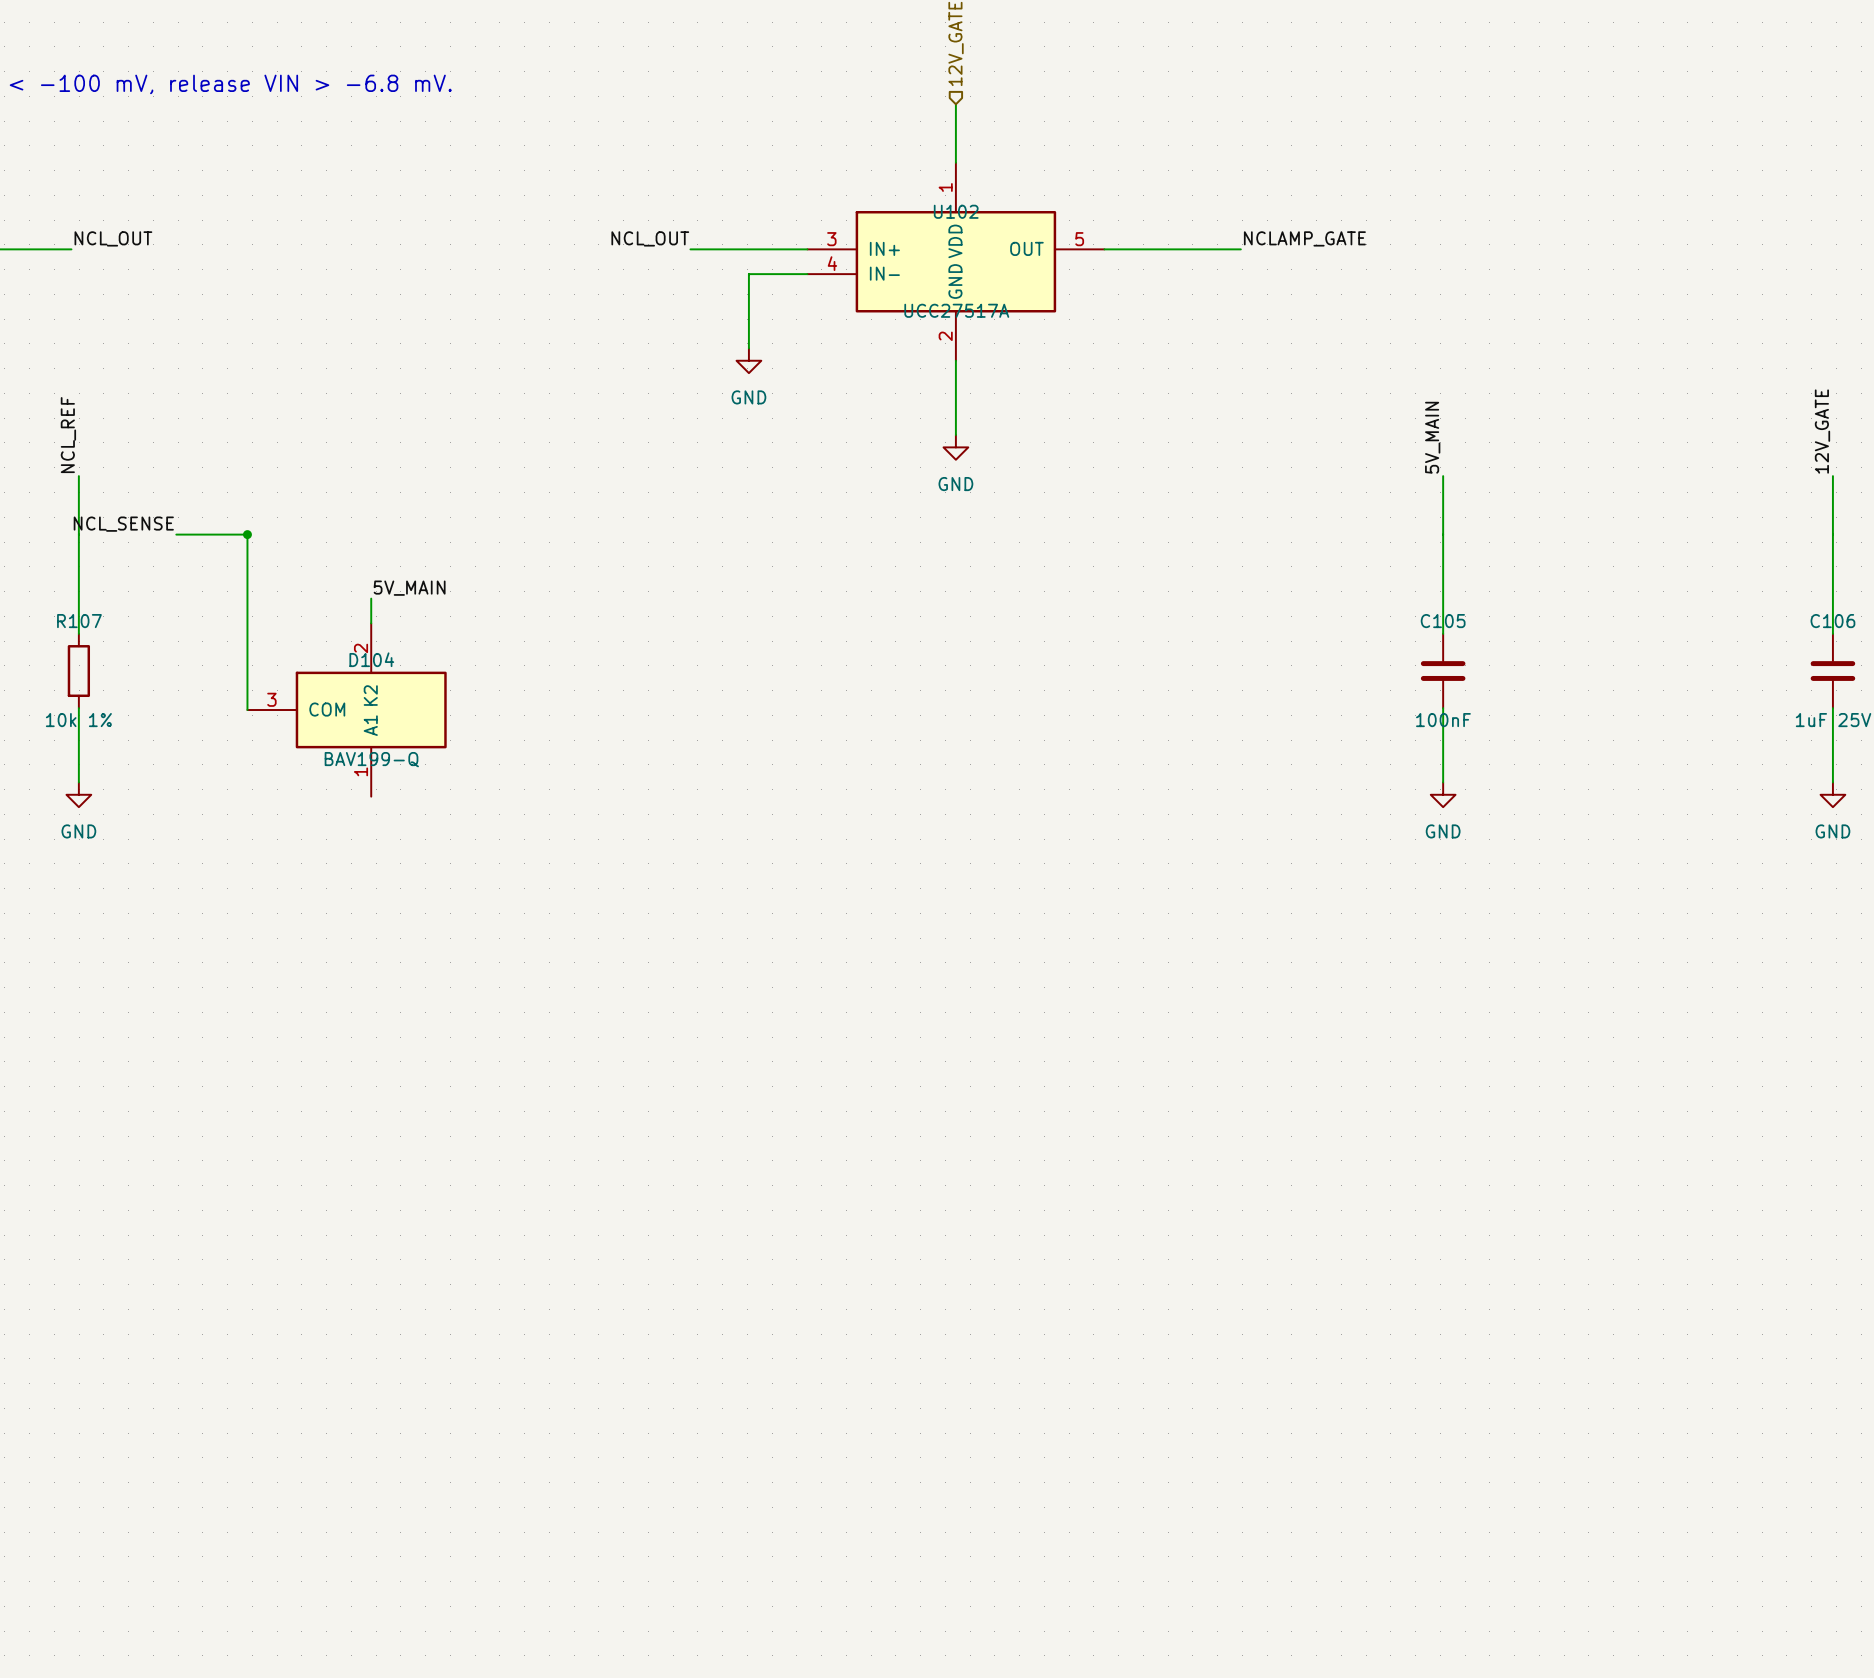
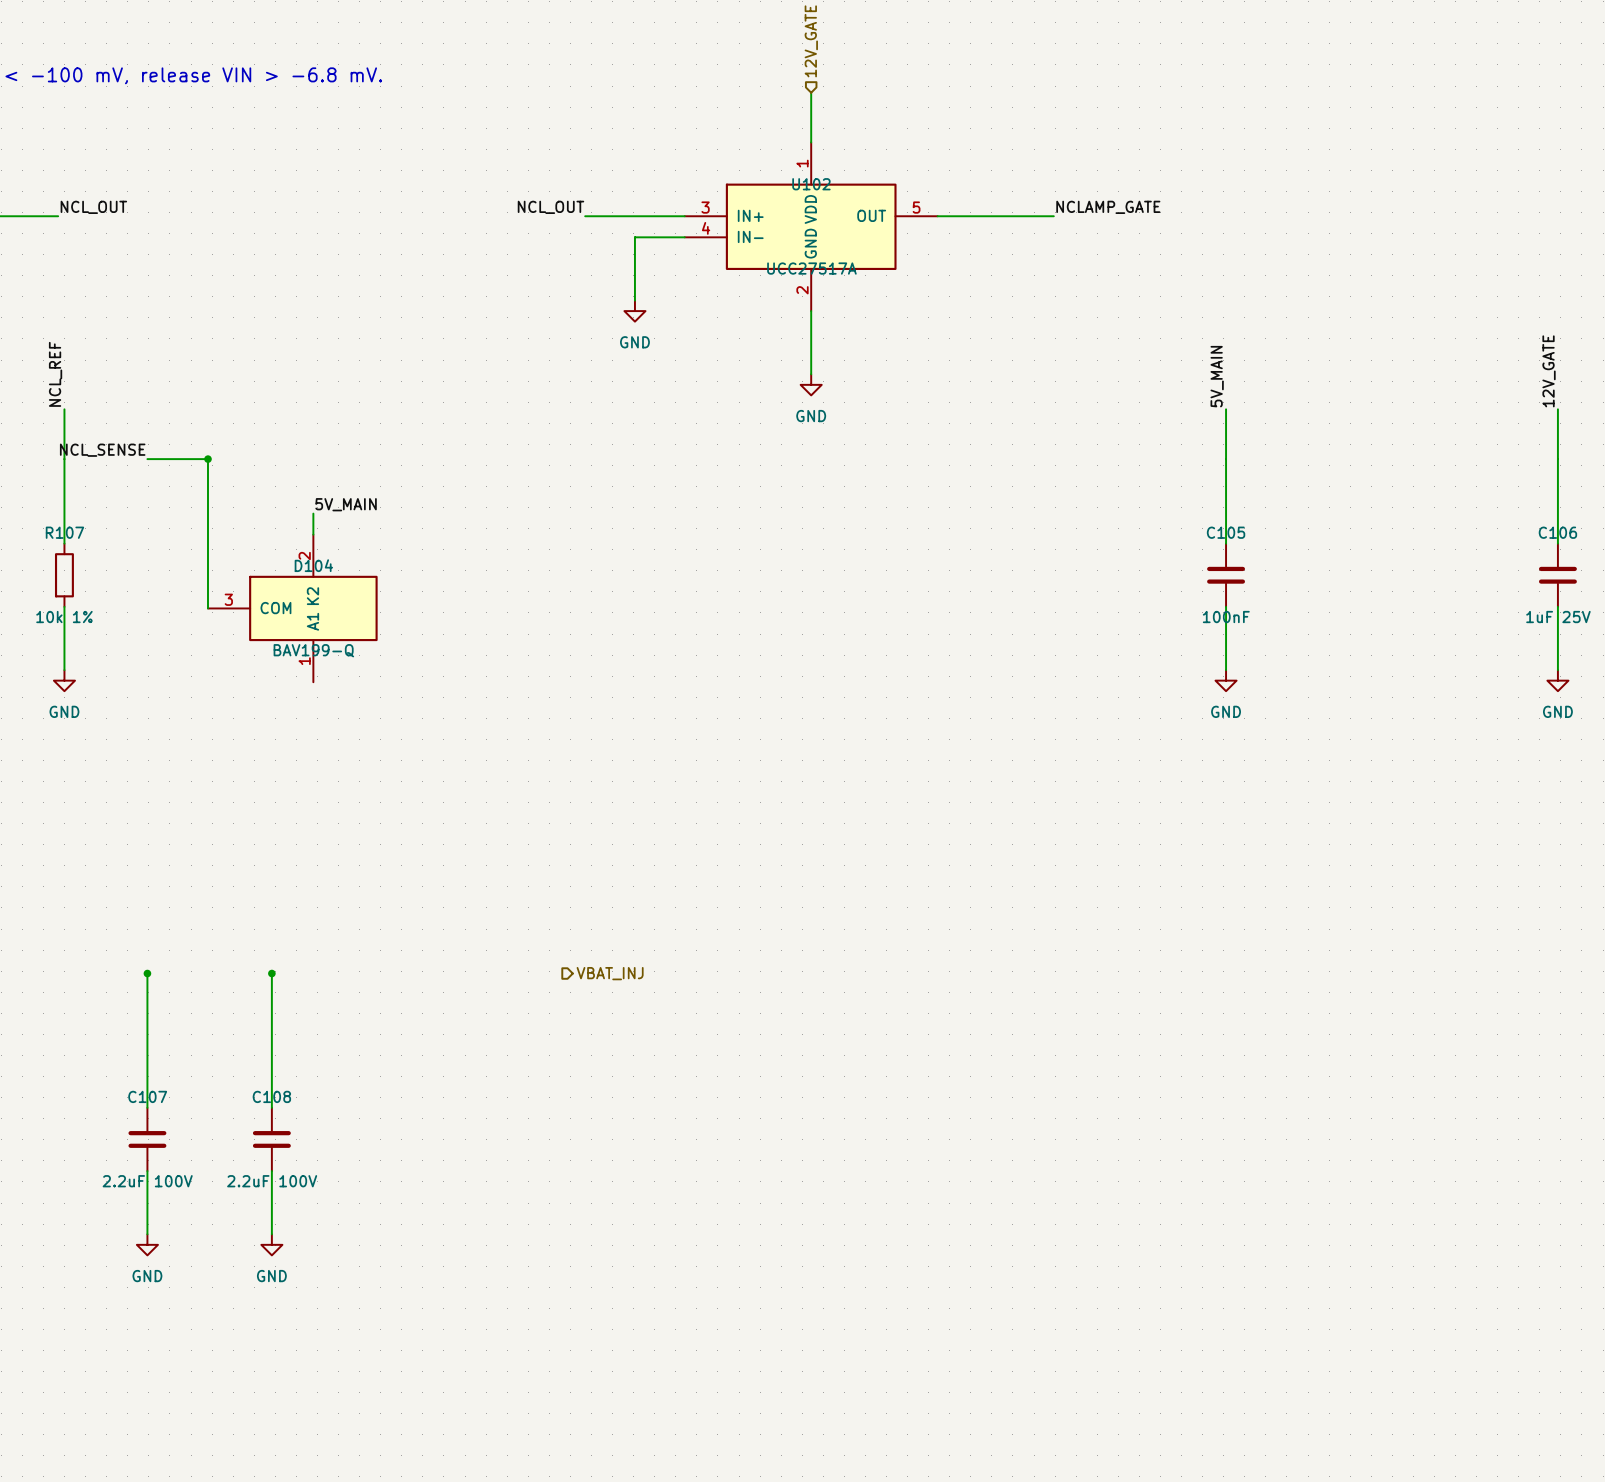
wire: none -> (147, 973) (147, 1107)
junction: none -> (147, 973)
wire: none -> (271, 973) (271, 1107)
junction: none -> (271, 973)
hierarchical label: none -> VBAT_INJ (610, 973)
C107: none -> 2.2uF 100V (147, 1139)
C108: none -> 2.2uF 100V (271, 1139)
wire: none -> (147, 1171) (147, 1234)
wire: none -> (271, 1171) (271, 1234)
power symbol: none -> GND (147, 1244)
power symbol: none -> GND (271, 1244)

